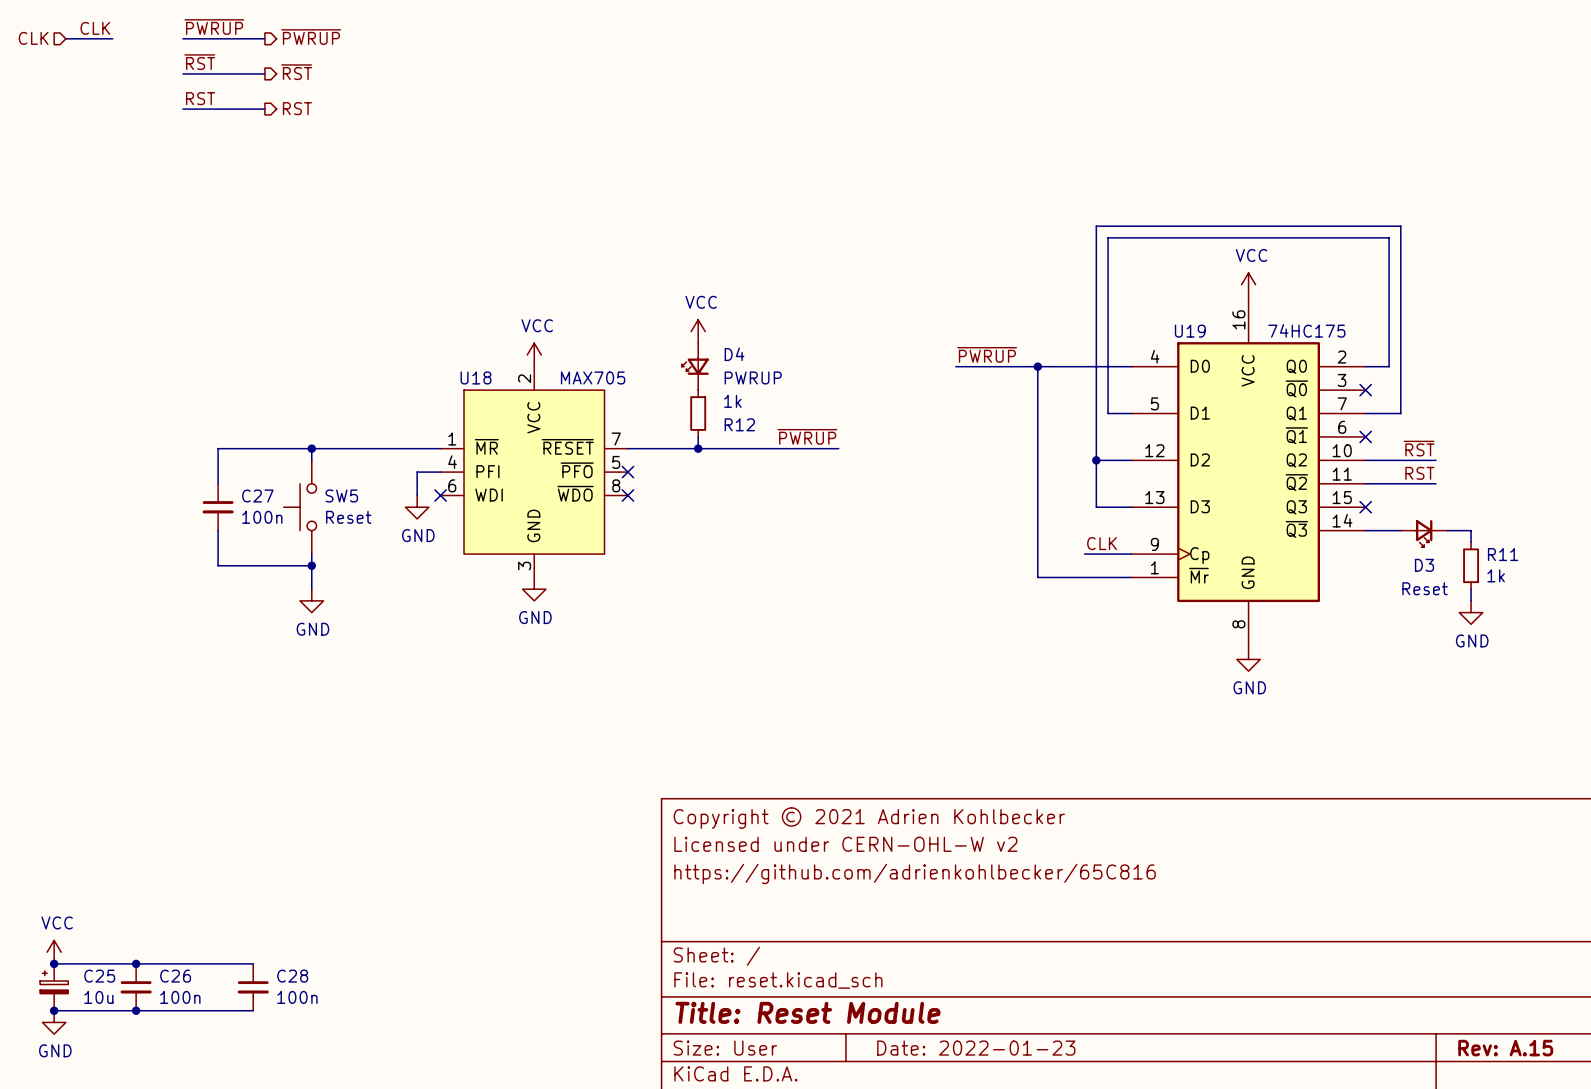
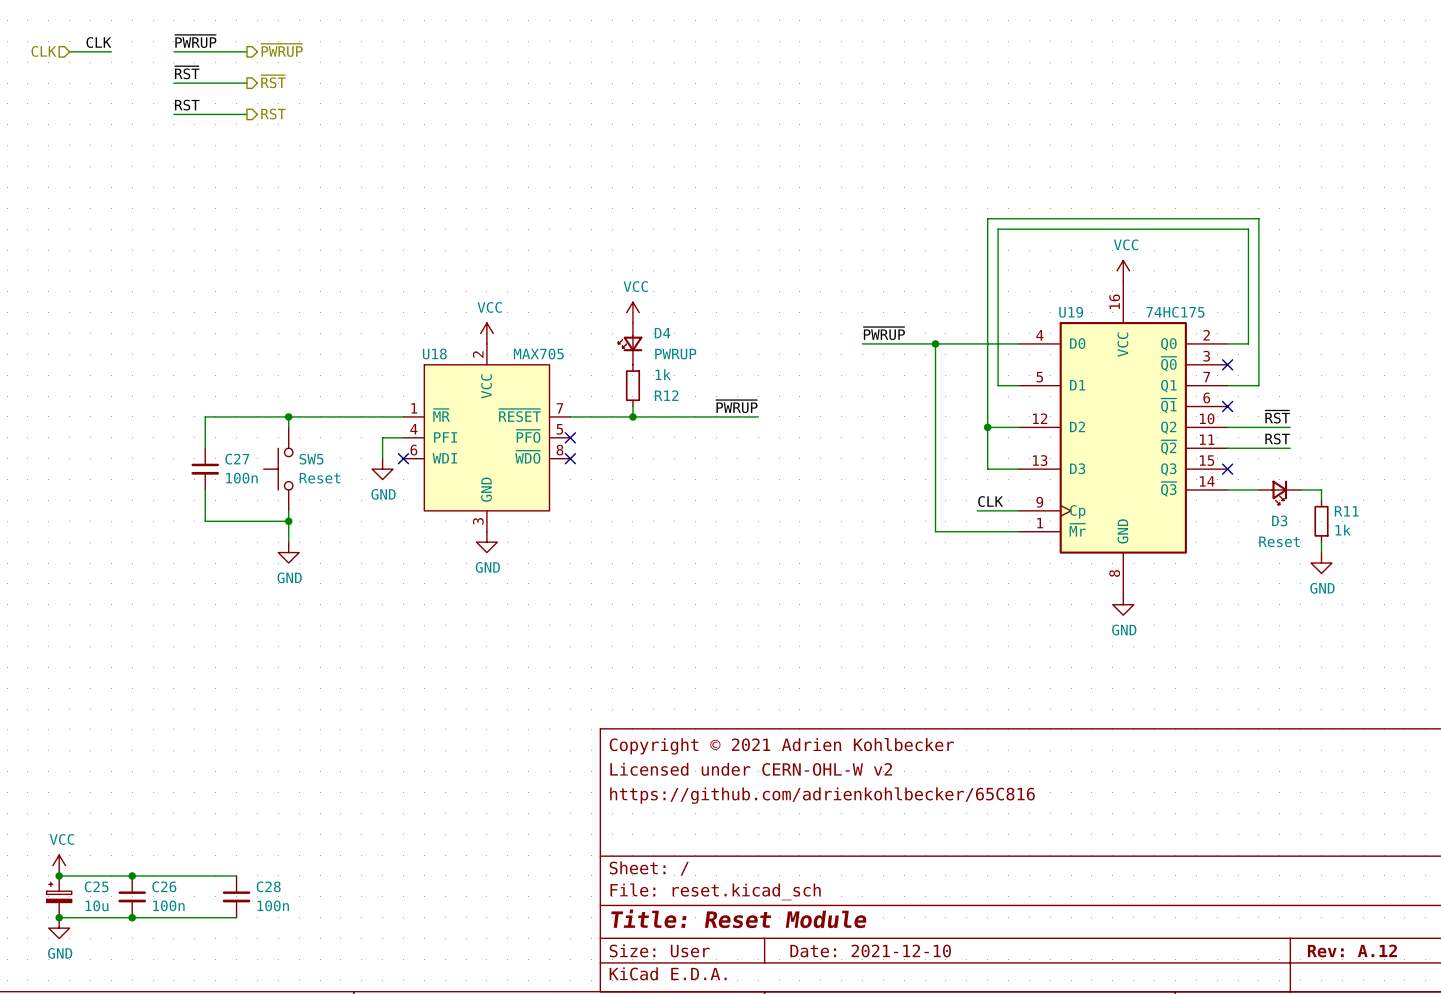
title block: Date: 2022-01-23 (976, 1048) -> Date: 2021-12-10 (870, 950)
title block: Rev: A.15 (1505, 1048) -> Rev: A.12 (1352, 950)

